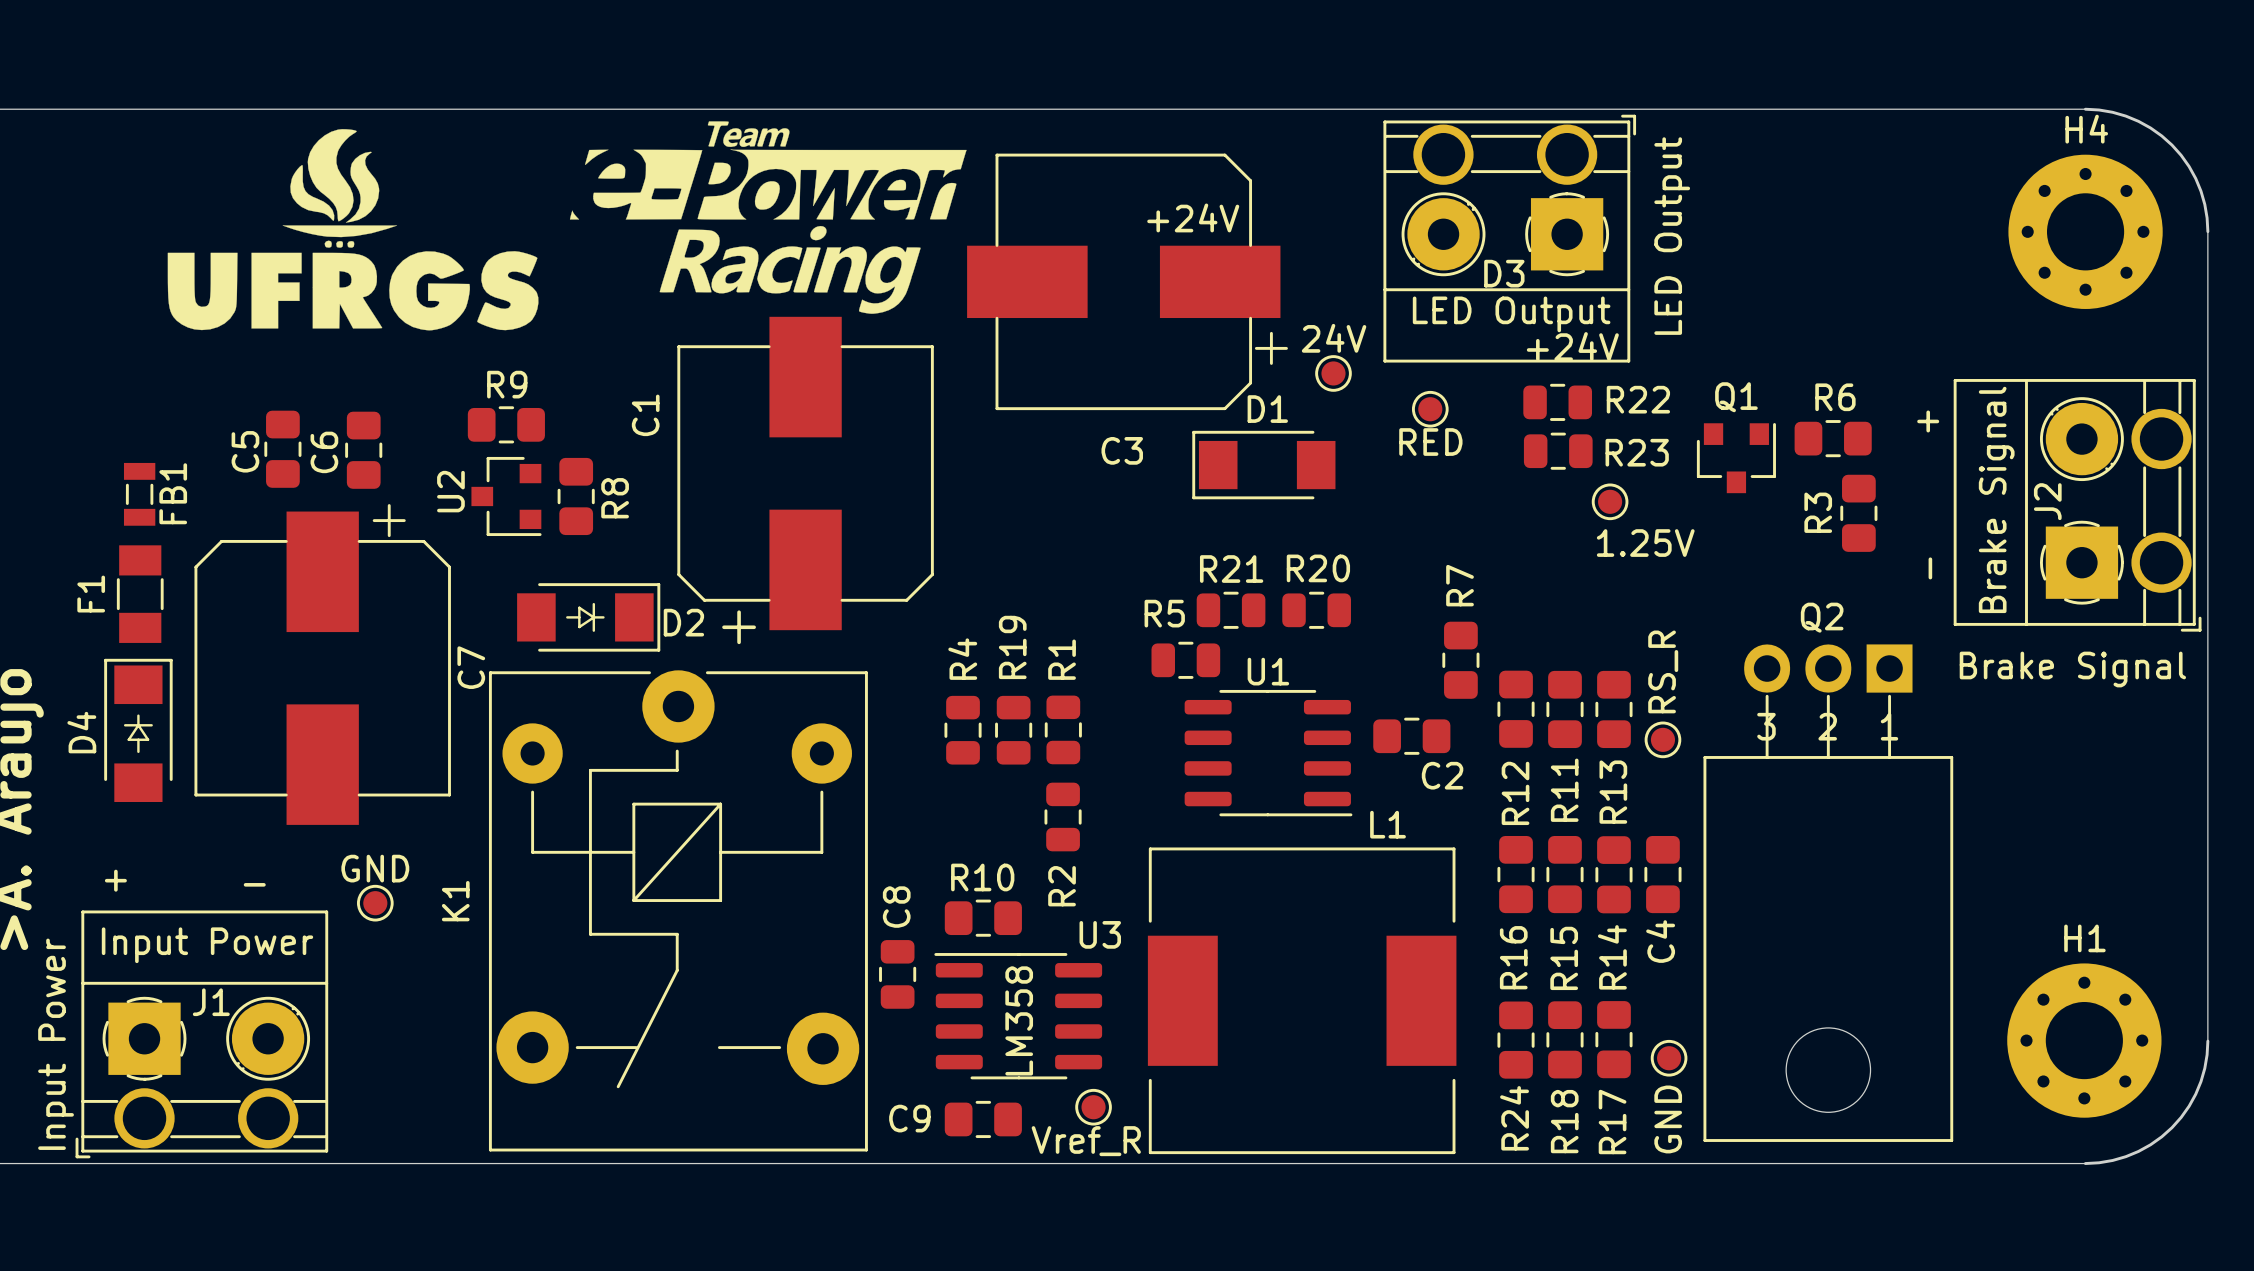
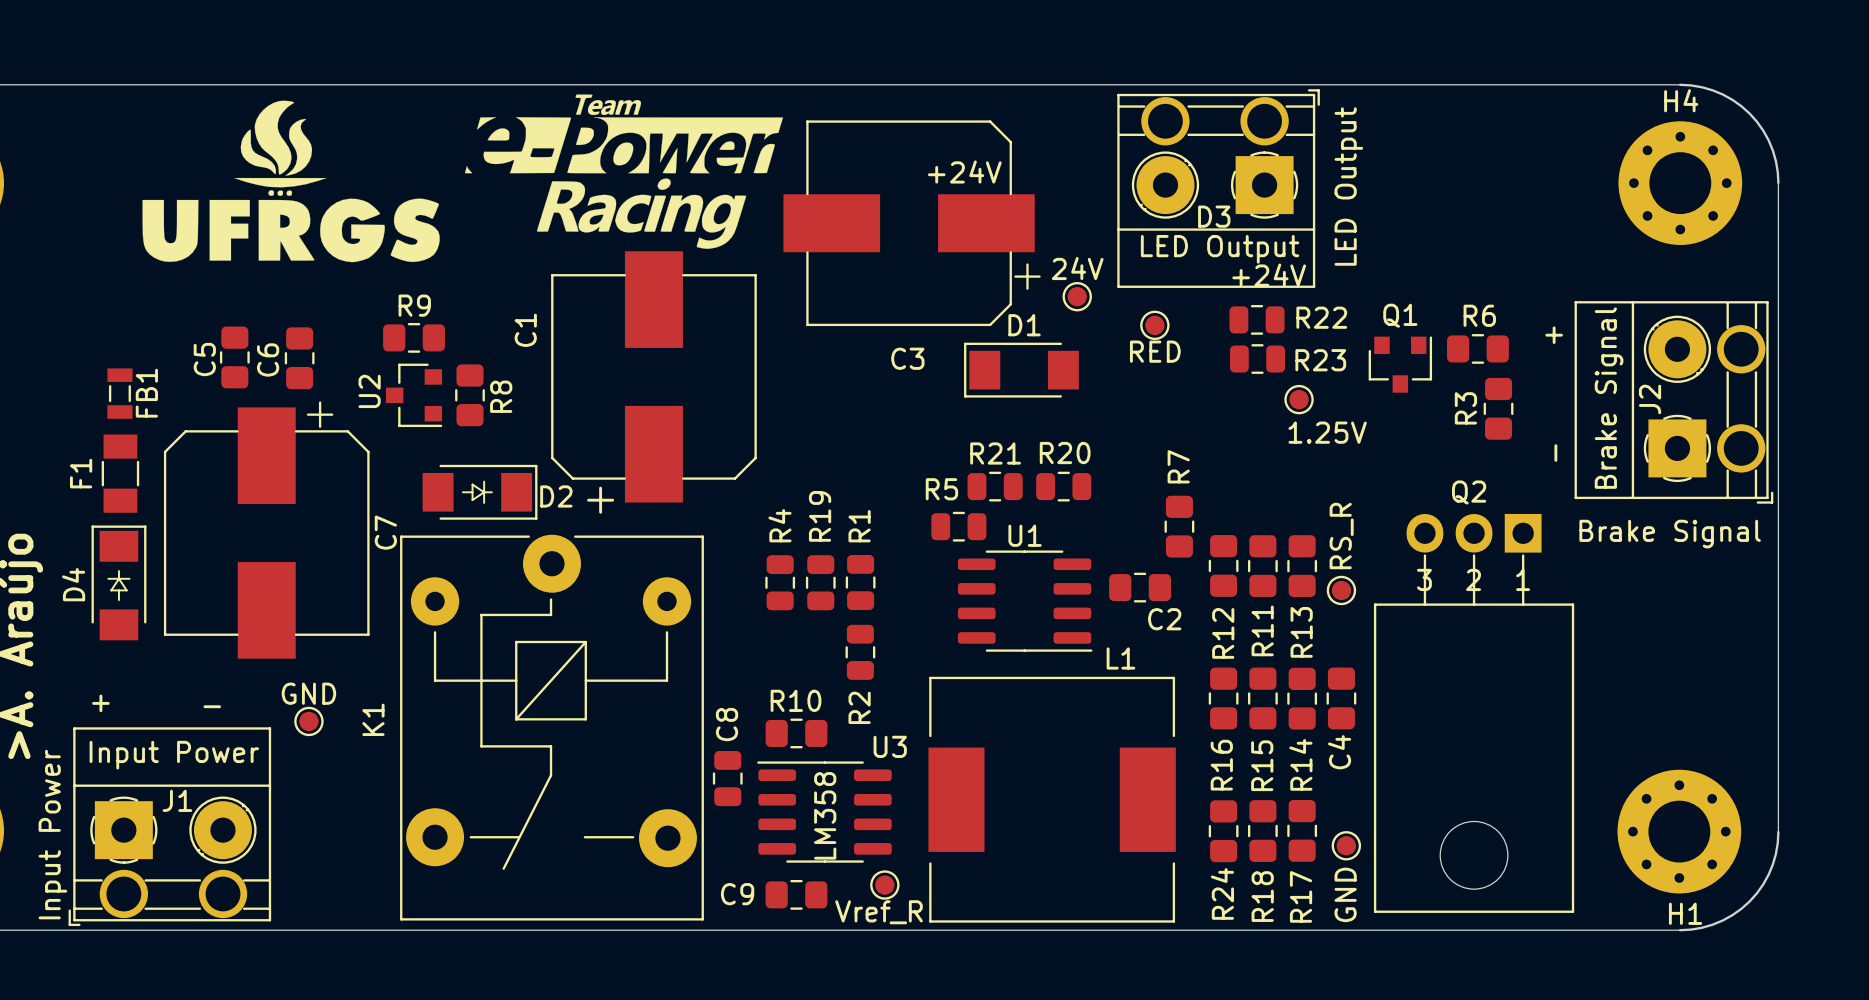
H1 name position: H1 (2084, 938) -> H1 (1685, 913)

